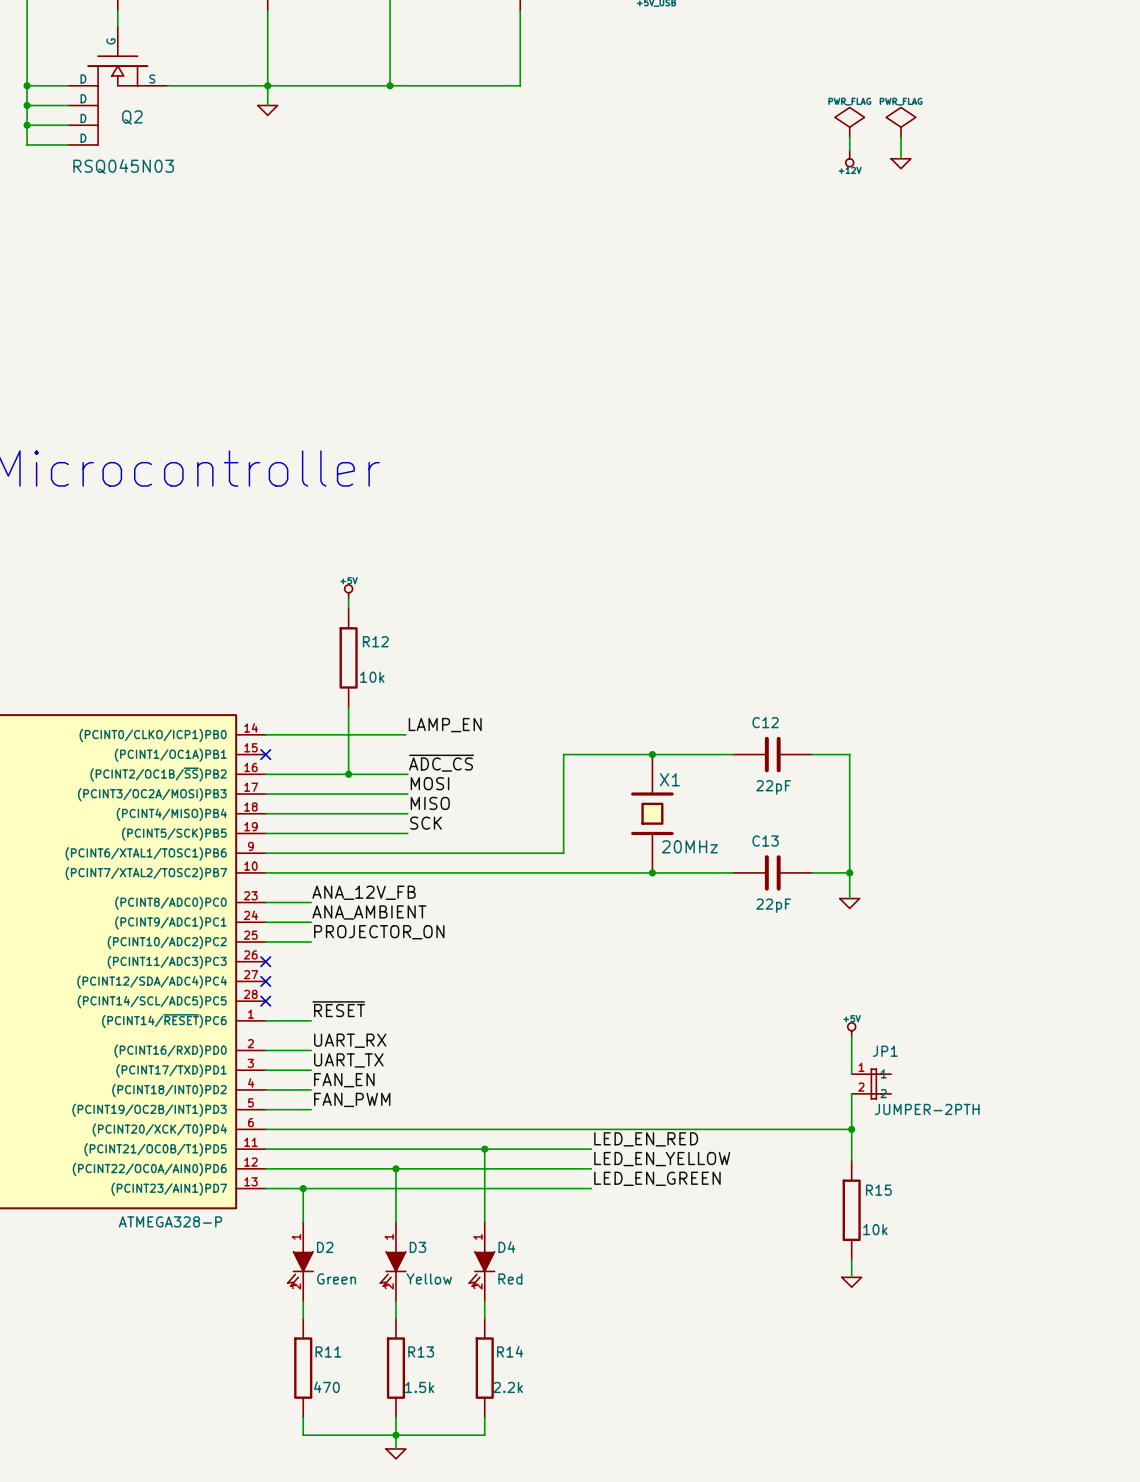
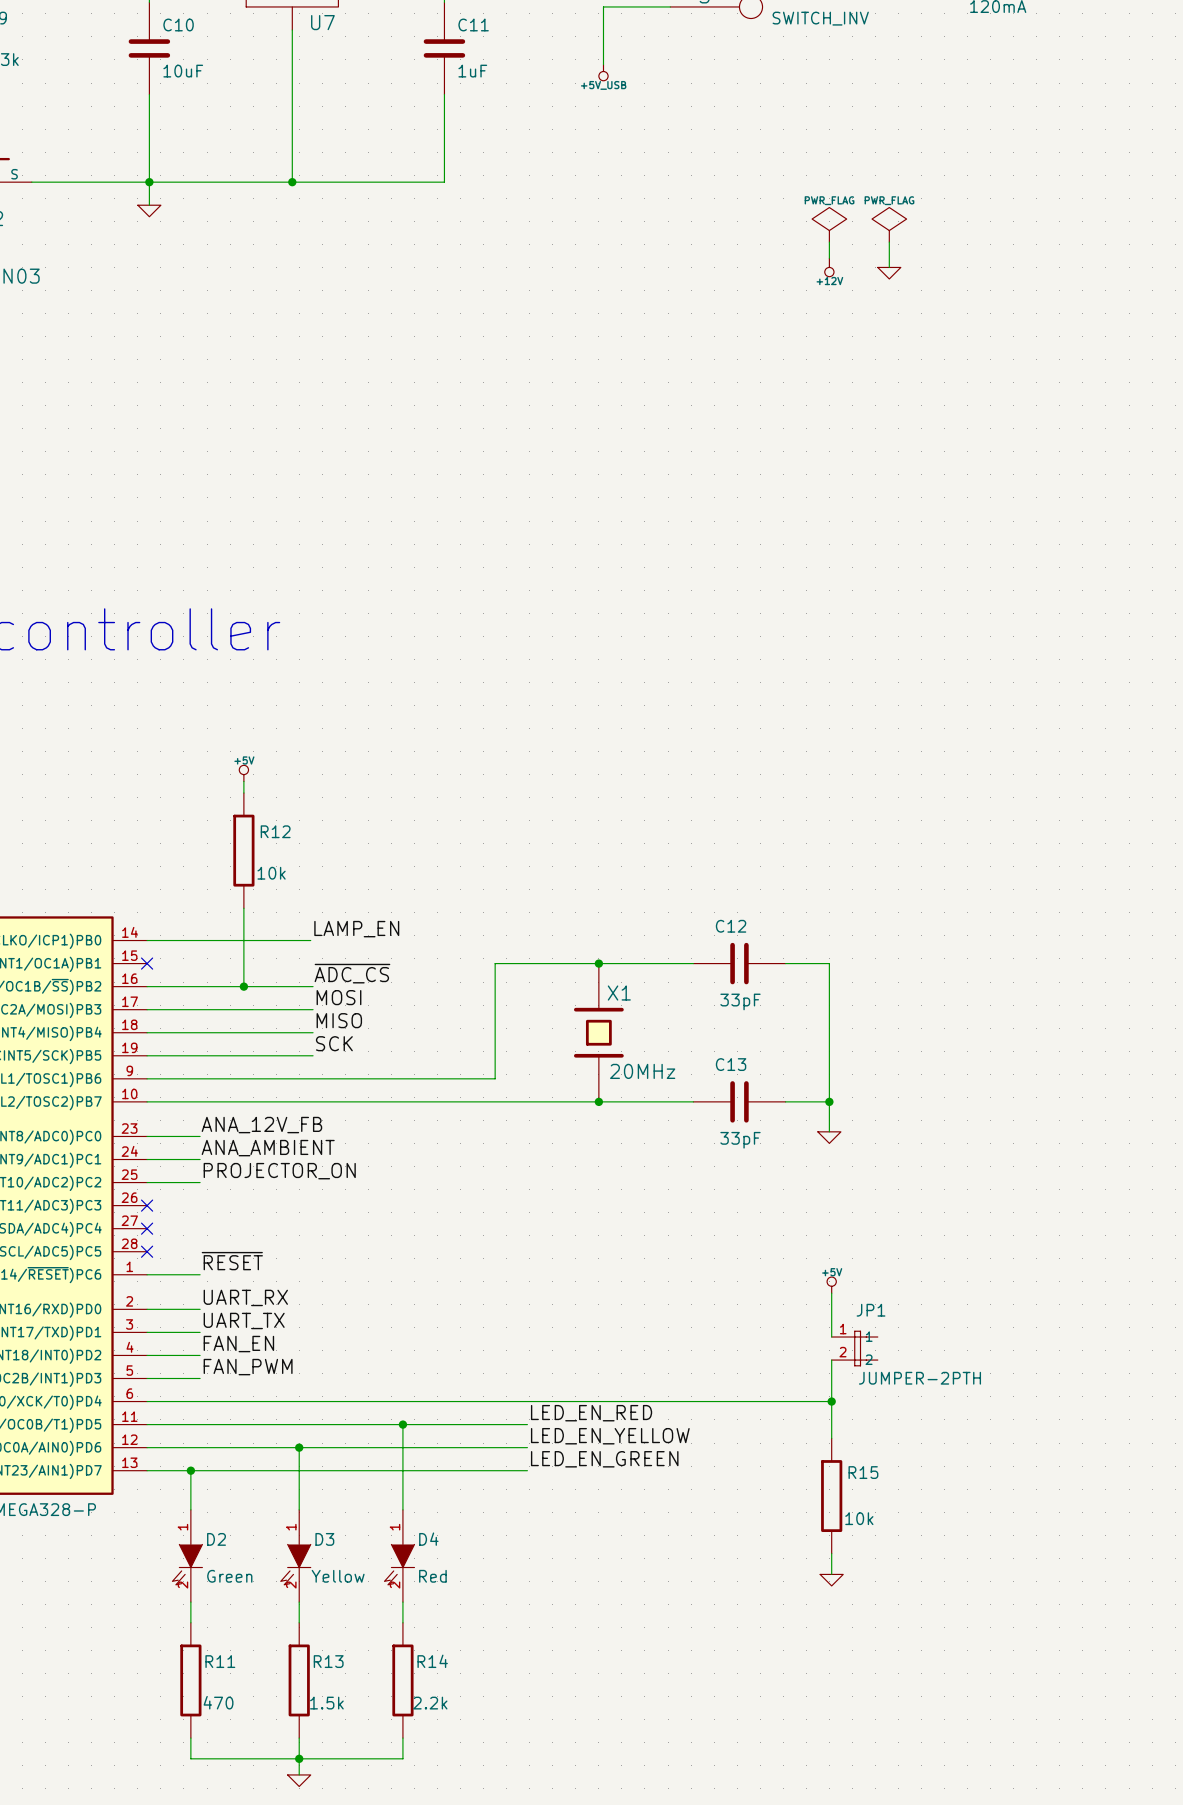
C12 value: 22pF (773, 787) -> 33pF (740, 1001)
C13 value: 22pF (773, 905) -> 33pF (740, 1140)

